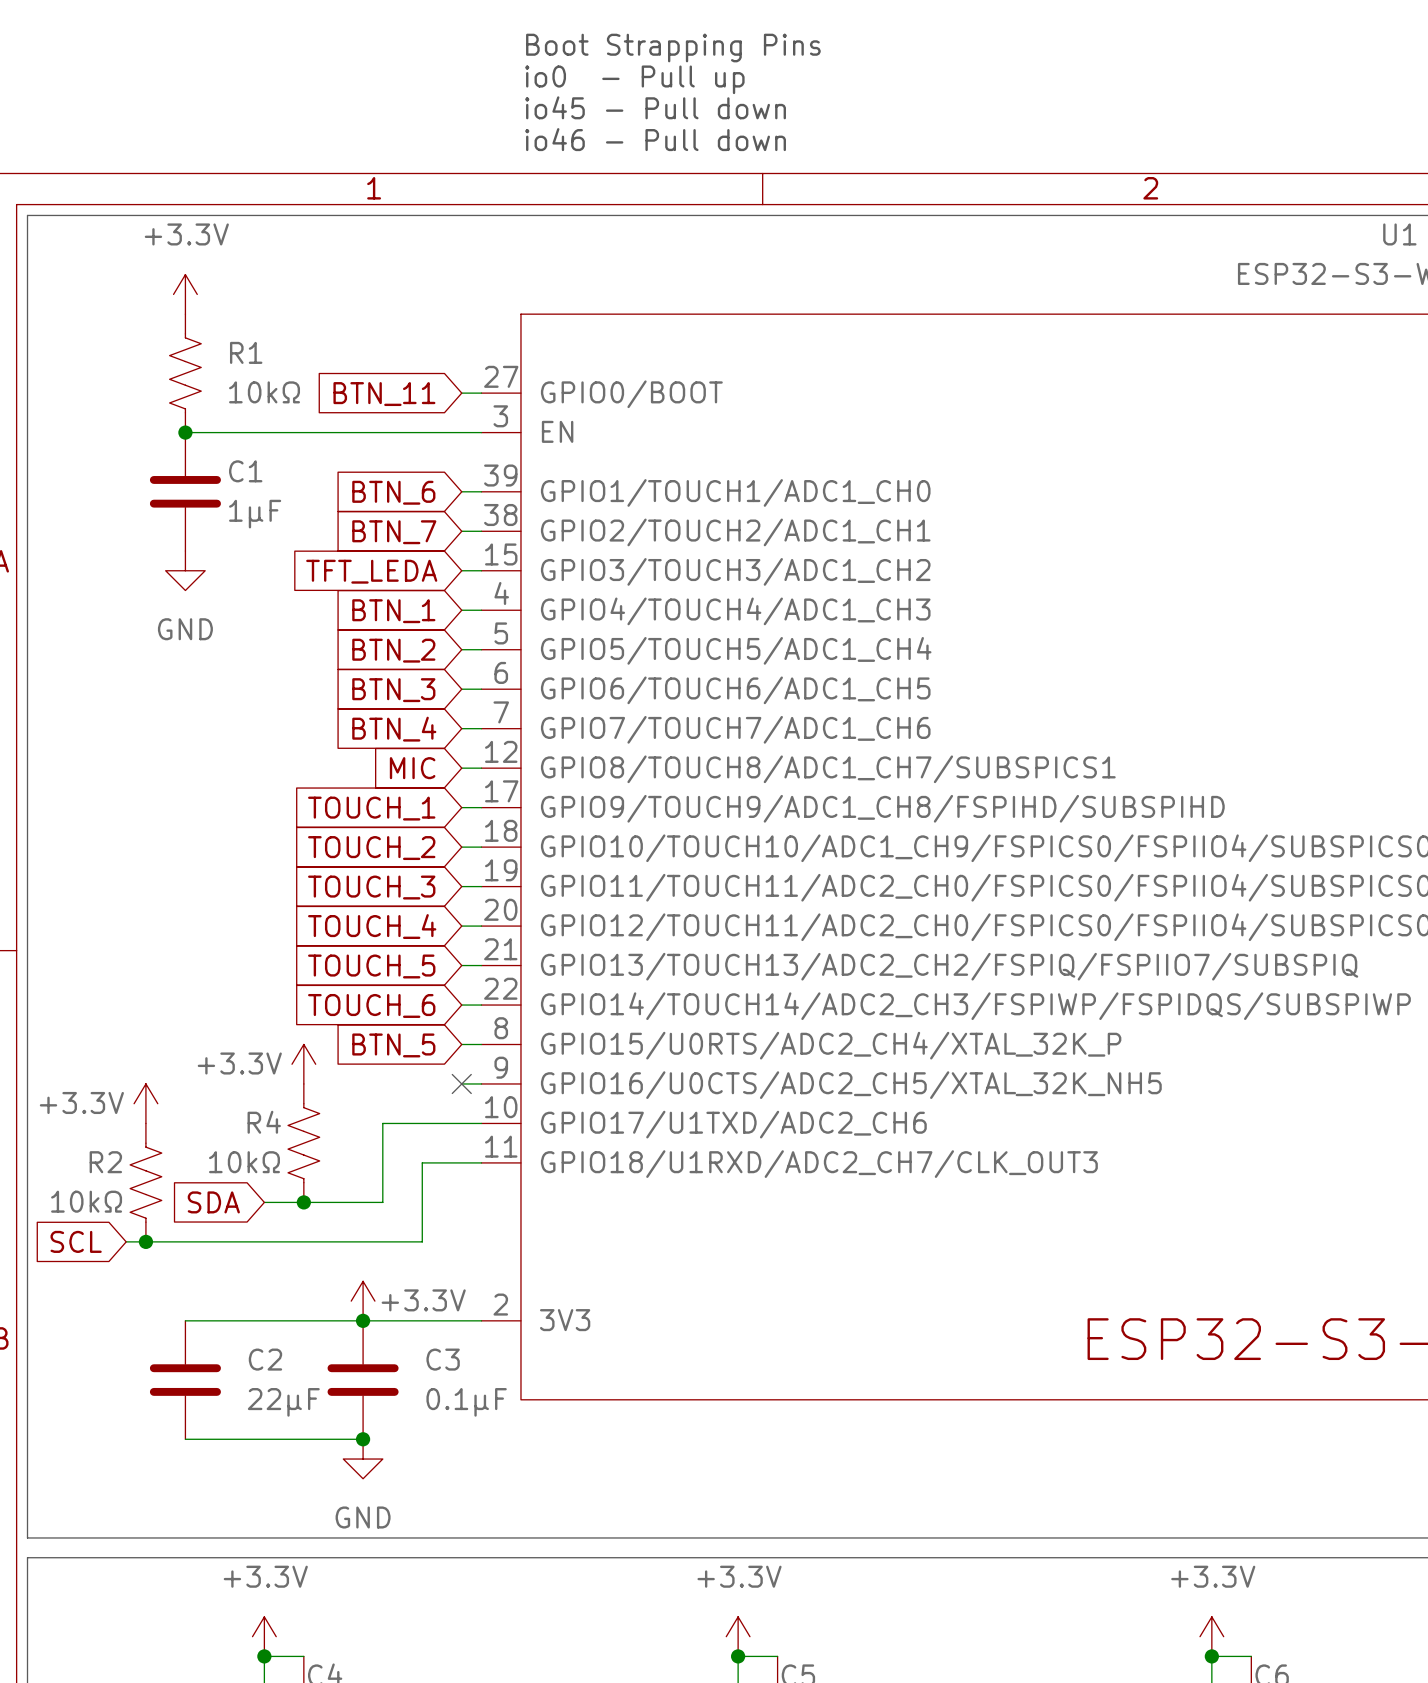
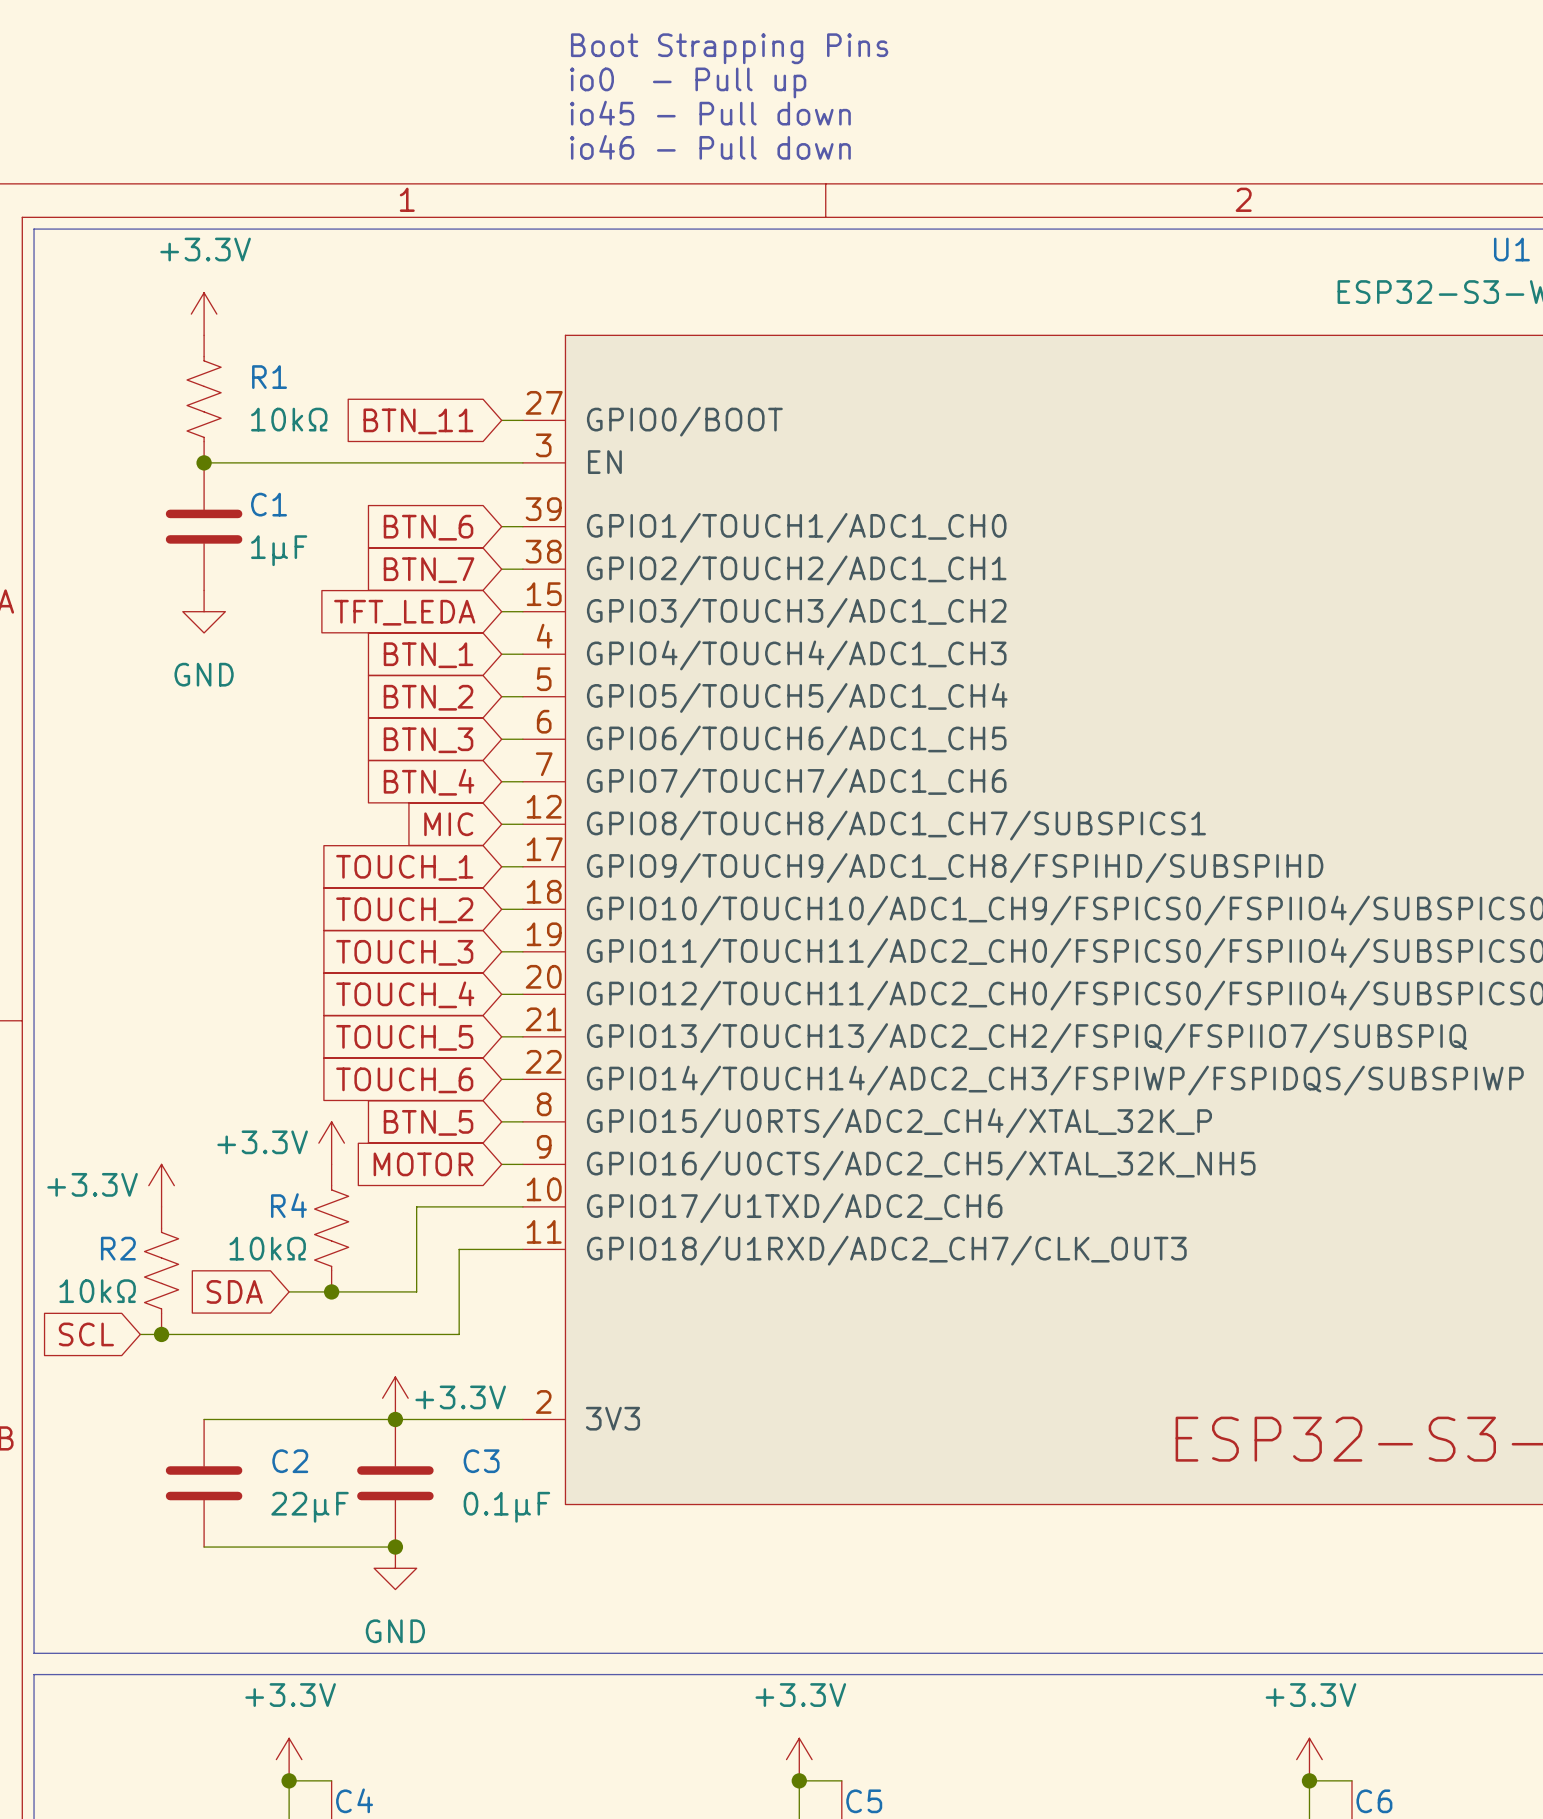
global label: none -> MOTOR (423, 1164)
no-connect mark: (461, 1083) -> none

